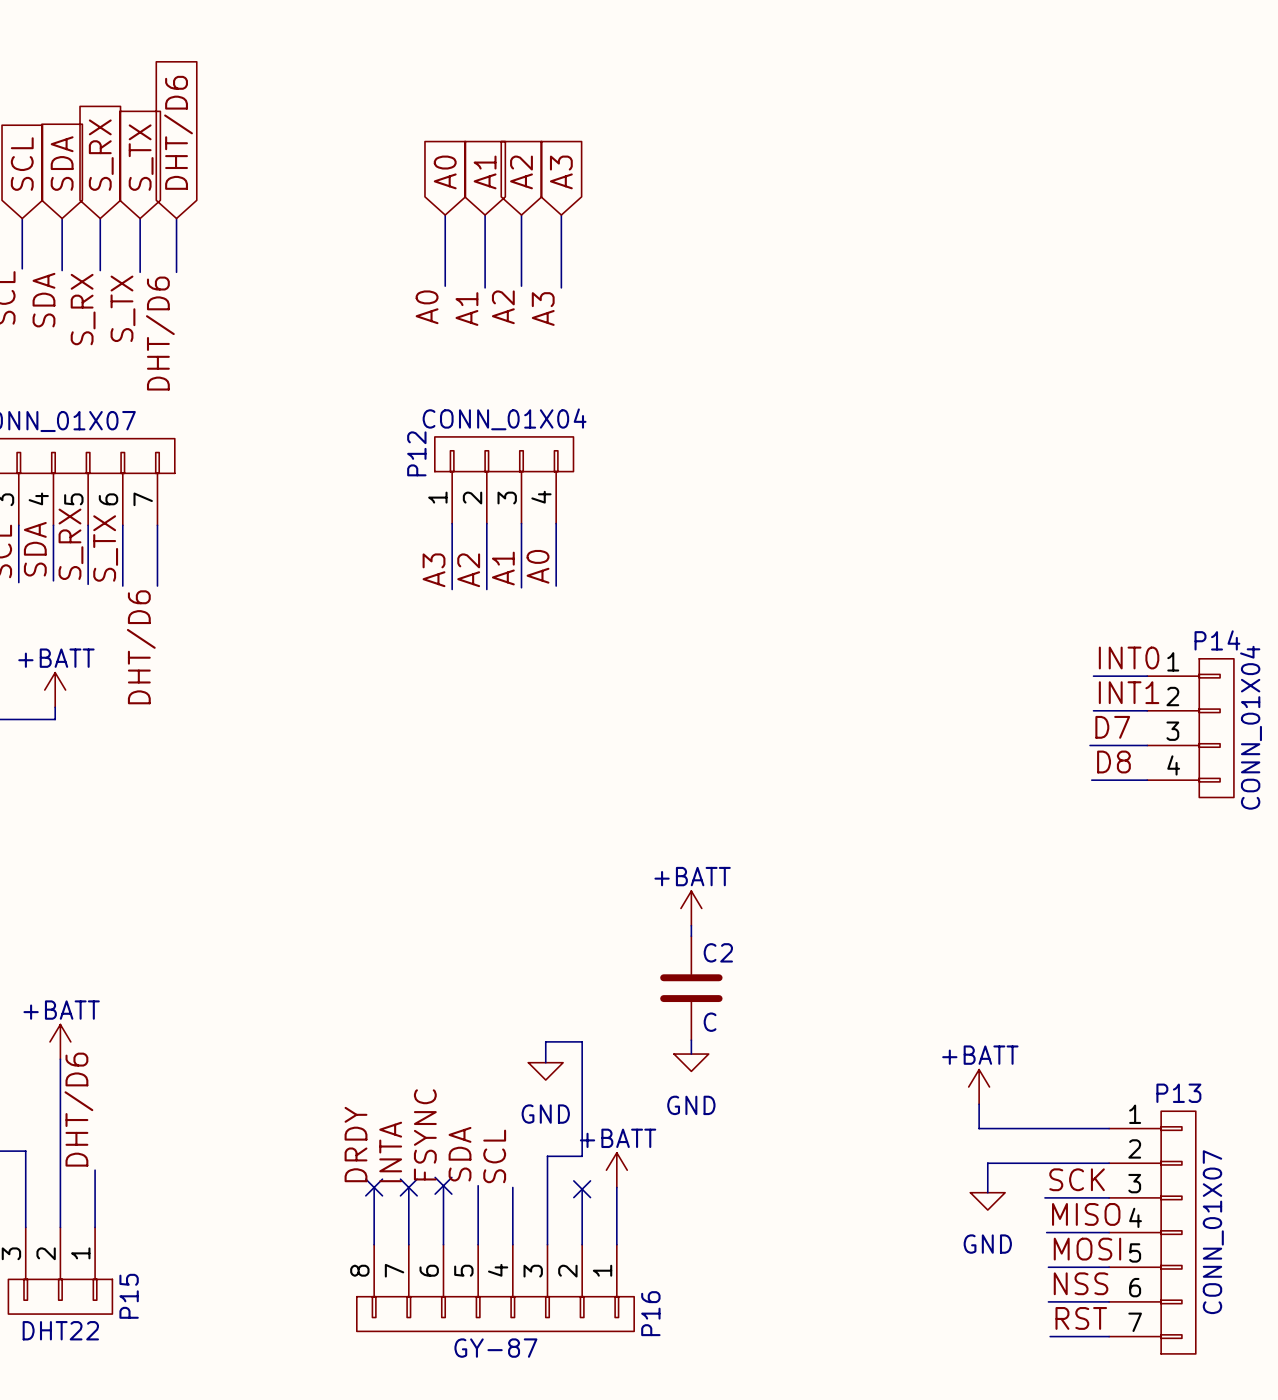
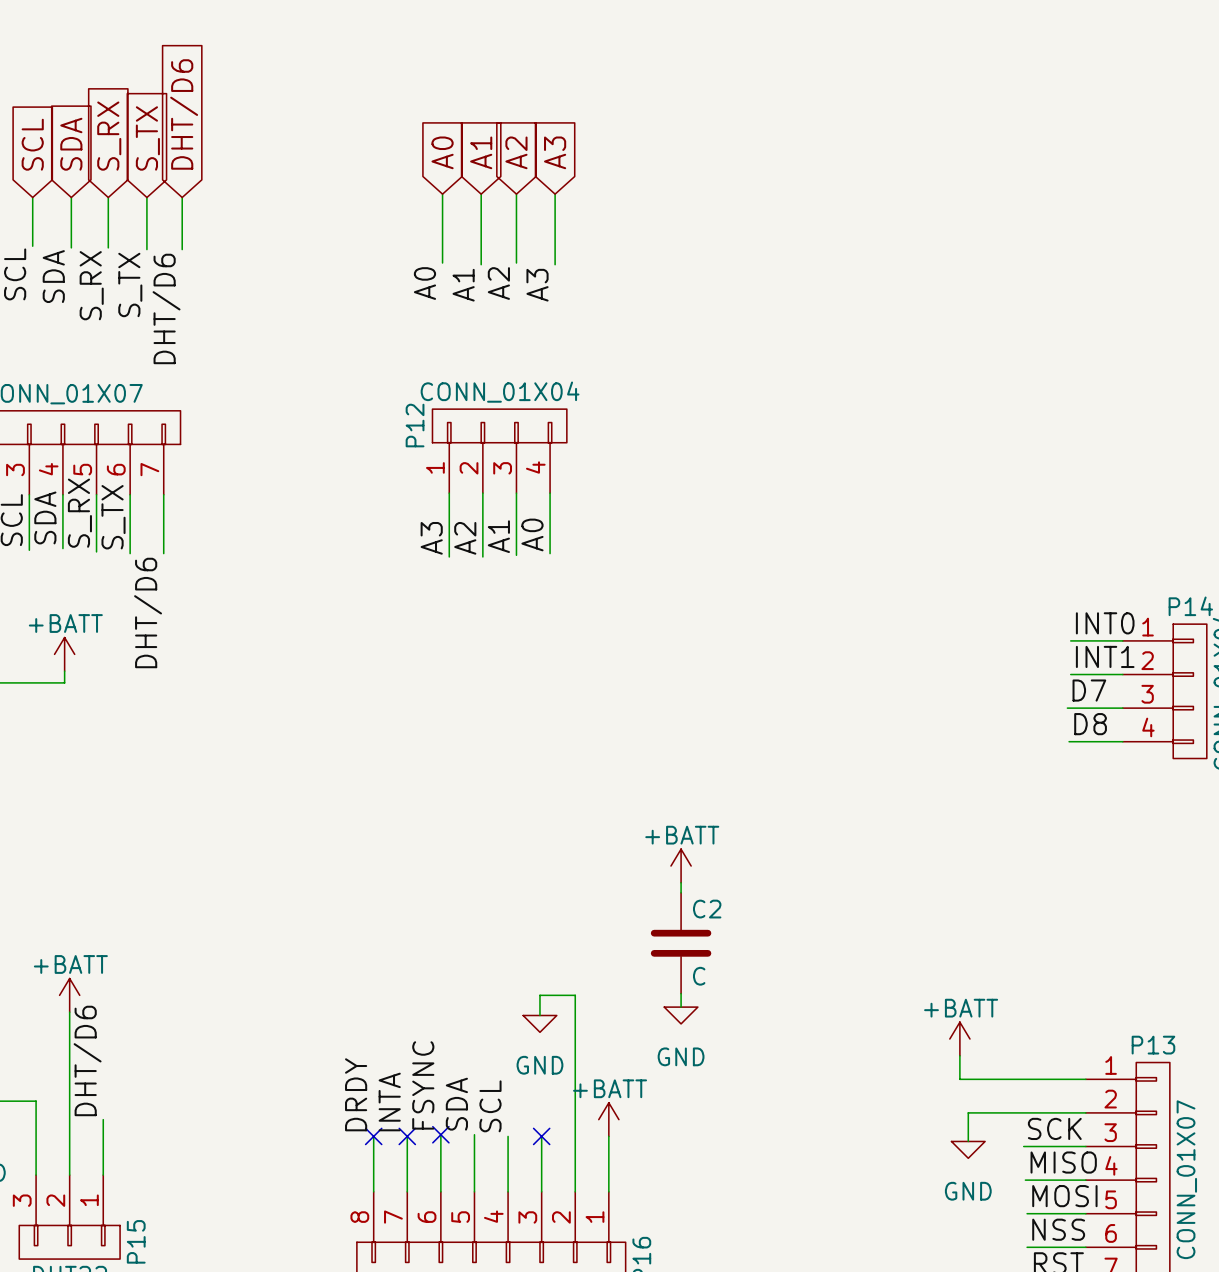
wire: (582, 1156) (547, 1156) (547, 1187) -> (575, 1106) (575, 1138)
no-connect mark position: (582, 1189) -> (541, 1136)

